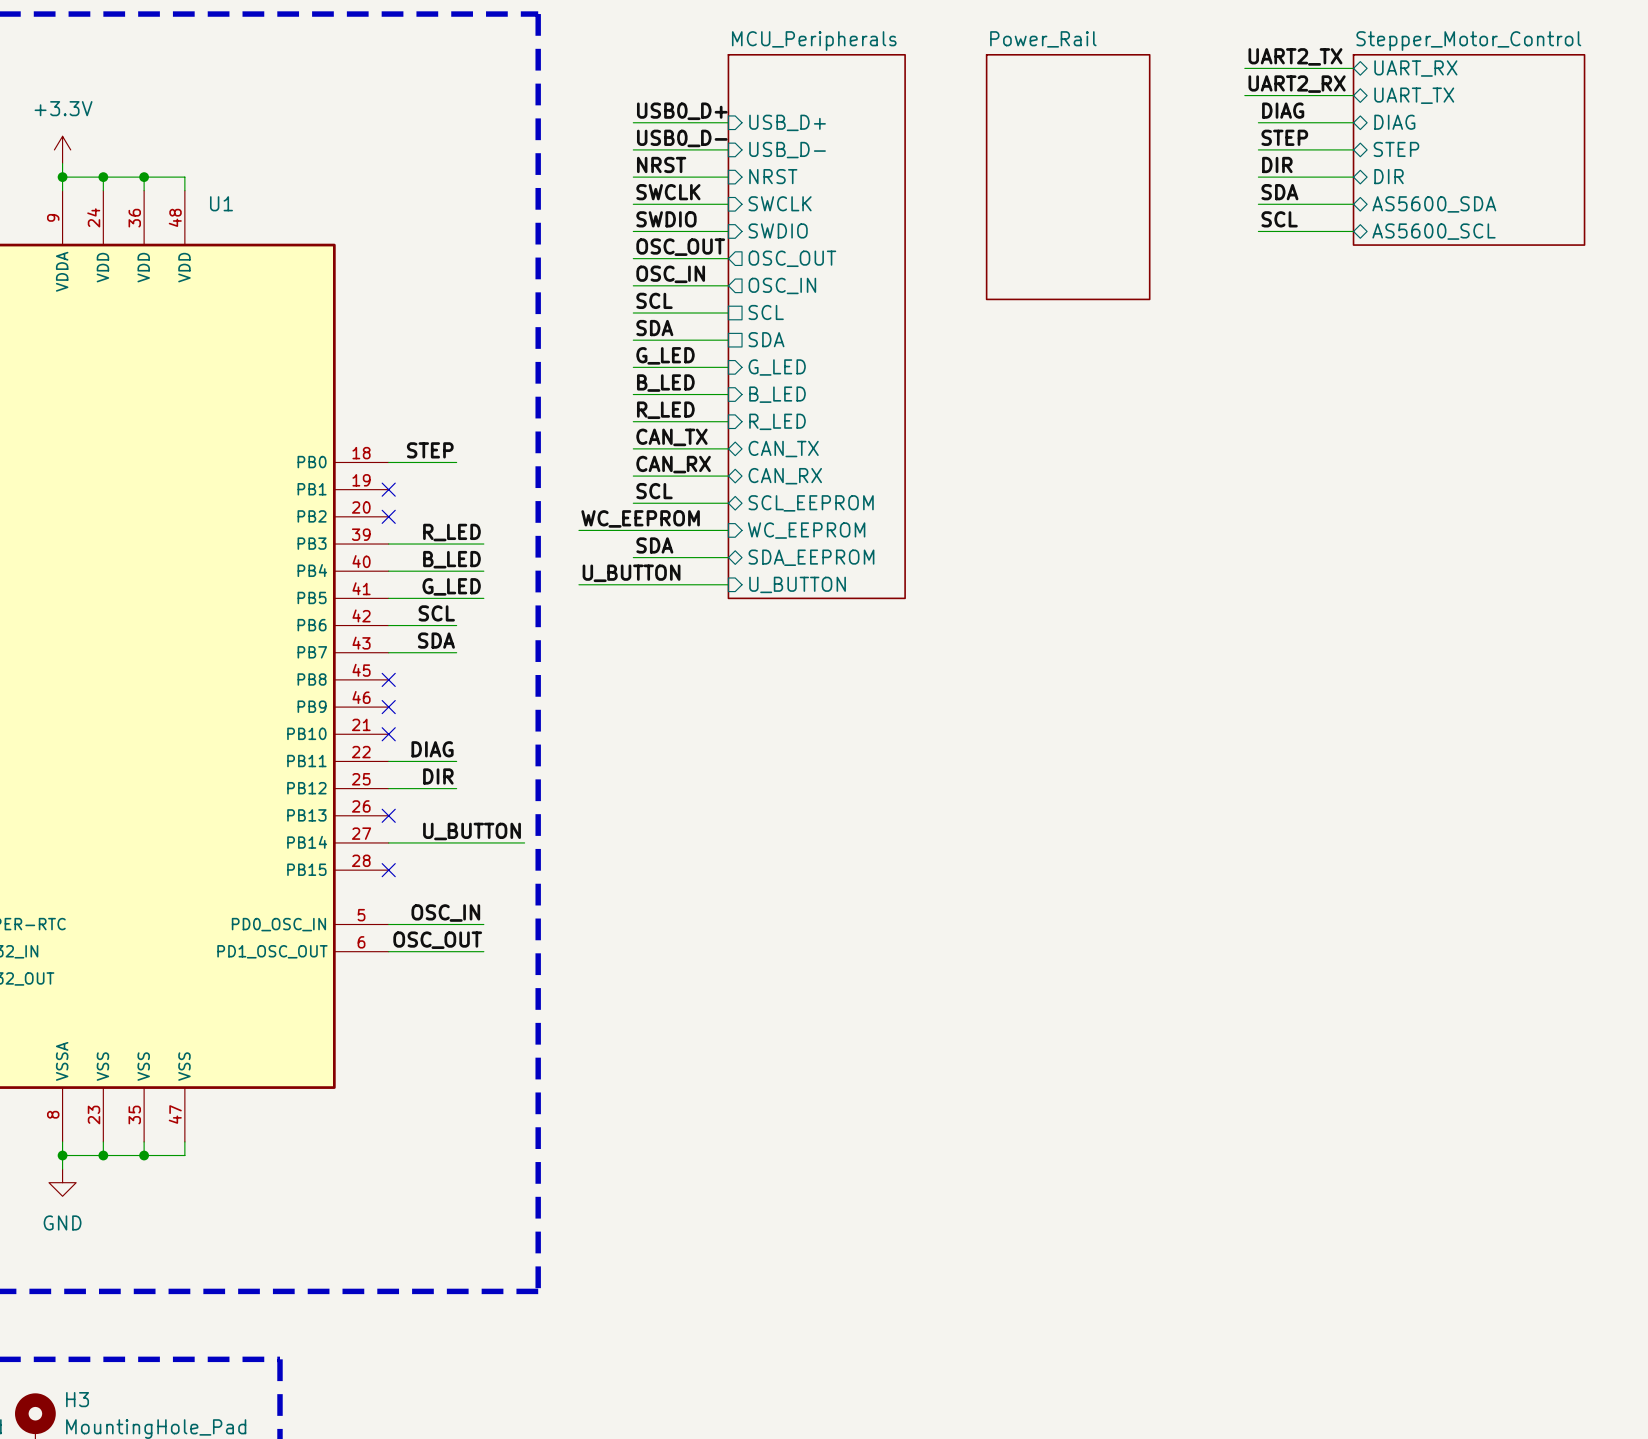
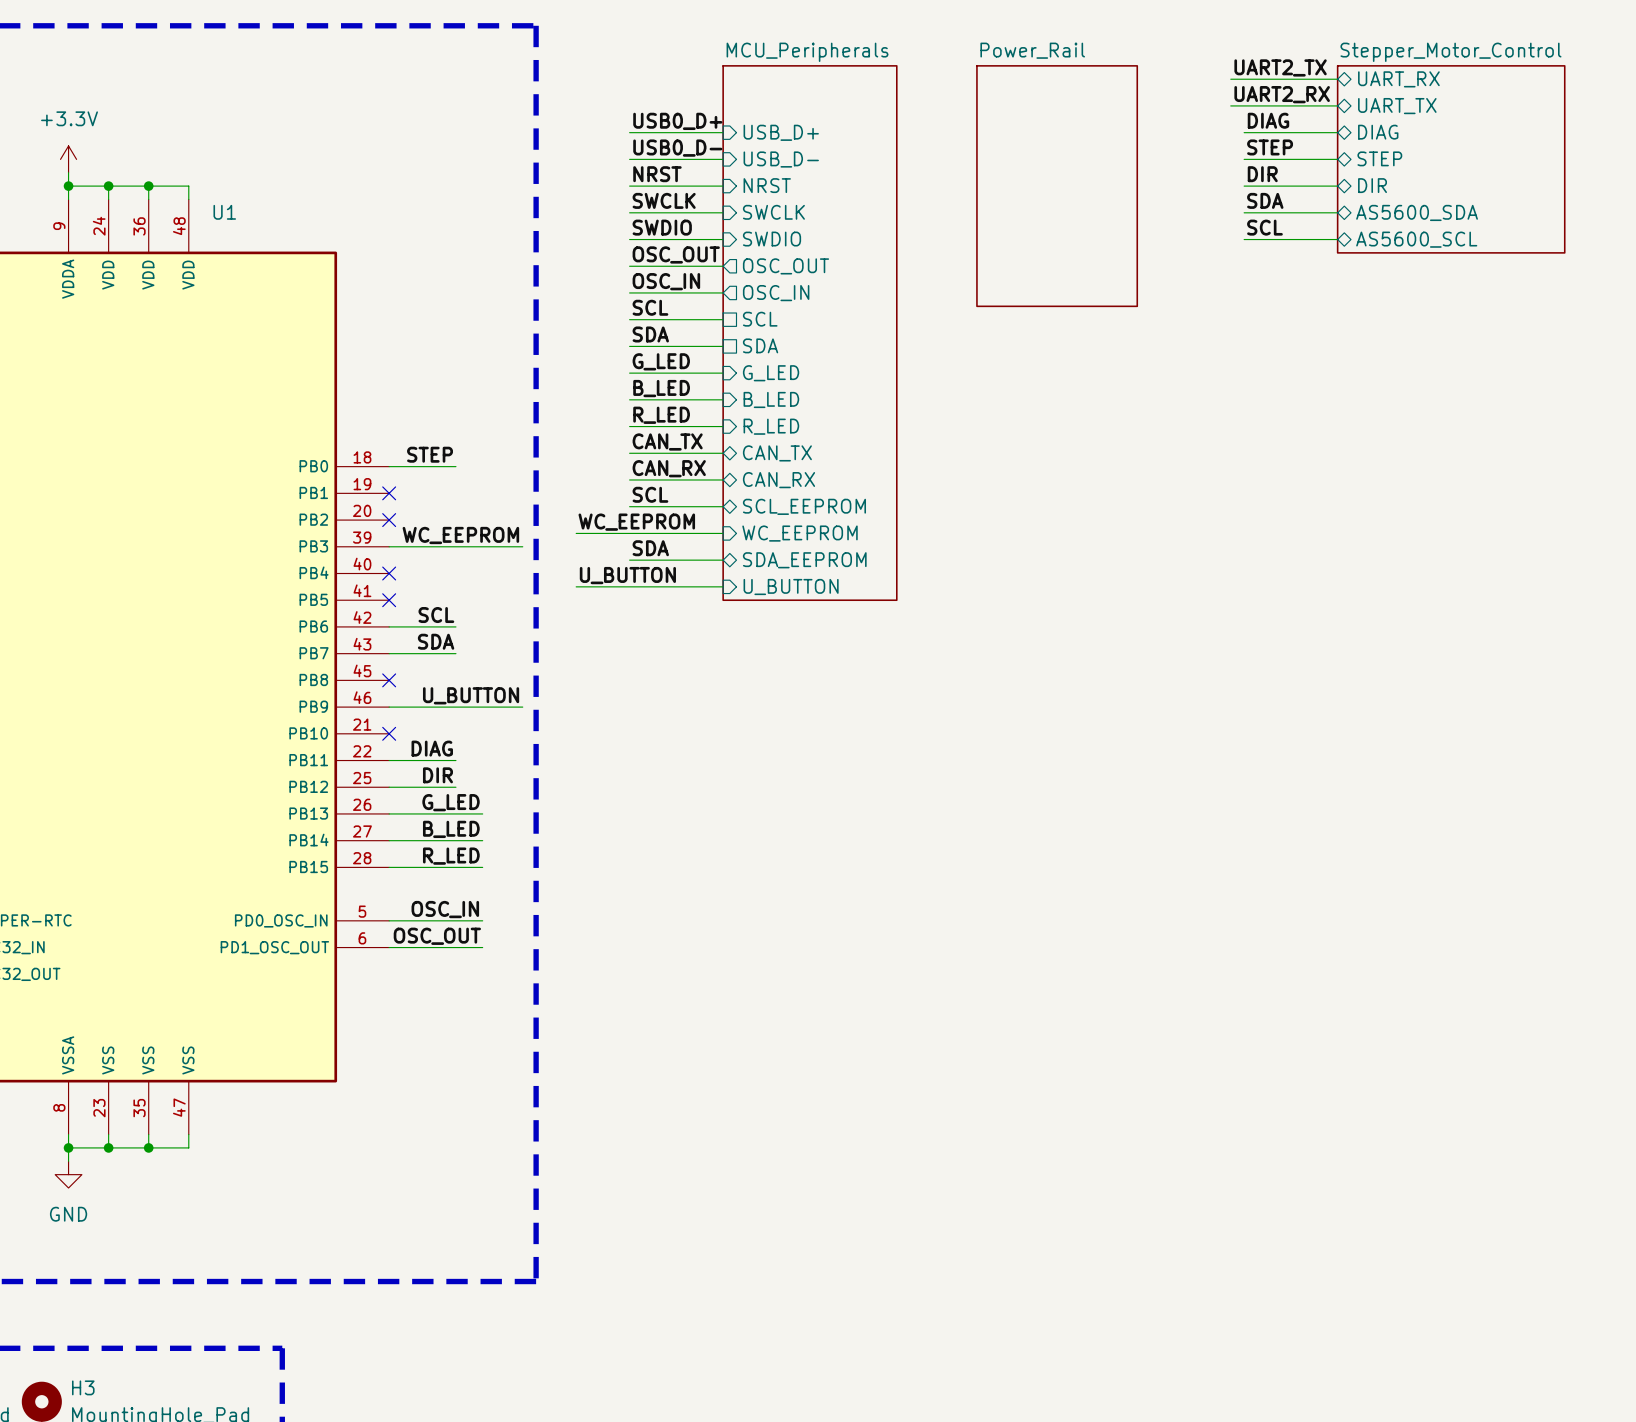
label: R_LED (451, 532) -> none
label: none -> WC_EEPROM (460, 535)
wire: none -> (482, 546) (522, 546)
label: B_LED (451, 559) -> none
wire: (388, 571) (483, 571) -> none
no-connect mark: none -> (389, 573)
label position: G_LED (451, 586) -> G_LED (451, 802)
wire: (388, 598) (483, 598) -> (389, 813) (482, 813)
no-connect mark: none -> (389, 600)
wire: none -> (389, 707) (522, 707)
no-connect mark: (388, 707) -> none
no-connect mark: (388, 815) -> none
label: none -> B_LED (451, 829)
label position: U_BUTTON (472, 831) -> U_BUTTON (471, 695)
wire: (483, 842) (524, 842) -> none
label: none -> R_LED (451, 856)
wire: none -> (389, 867) (482, 867)
no-connect mark: (388, 870) -> none

